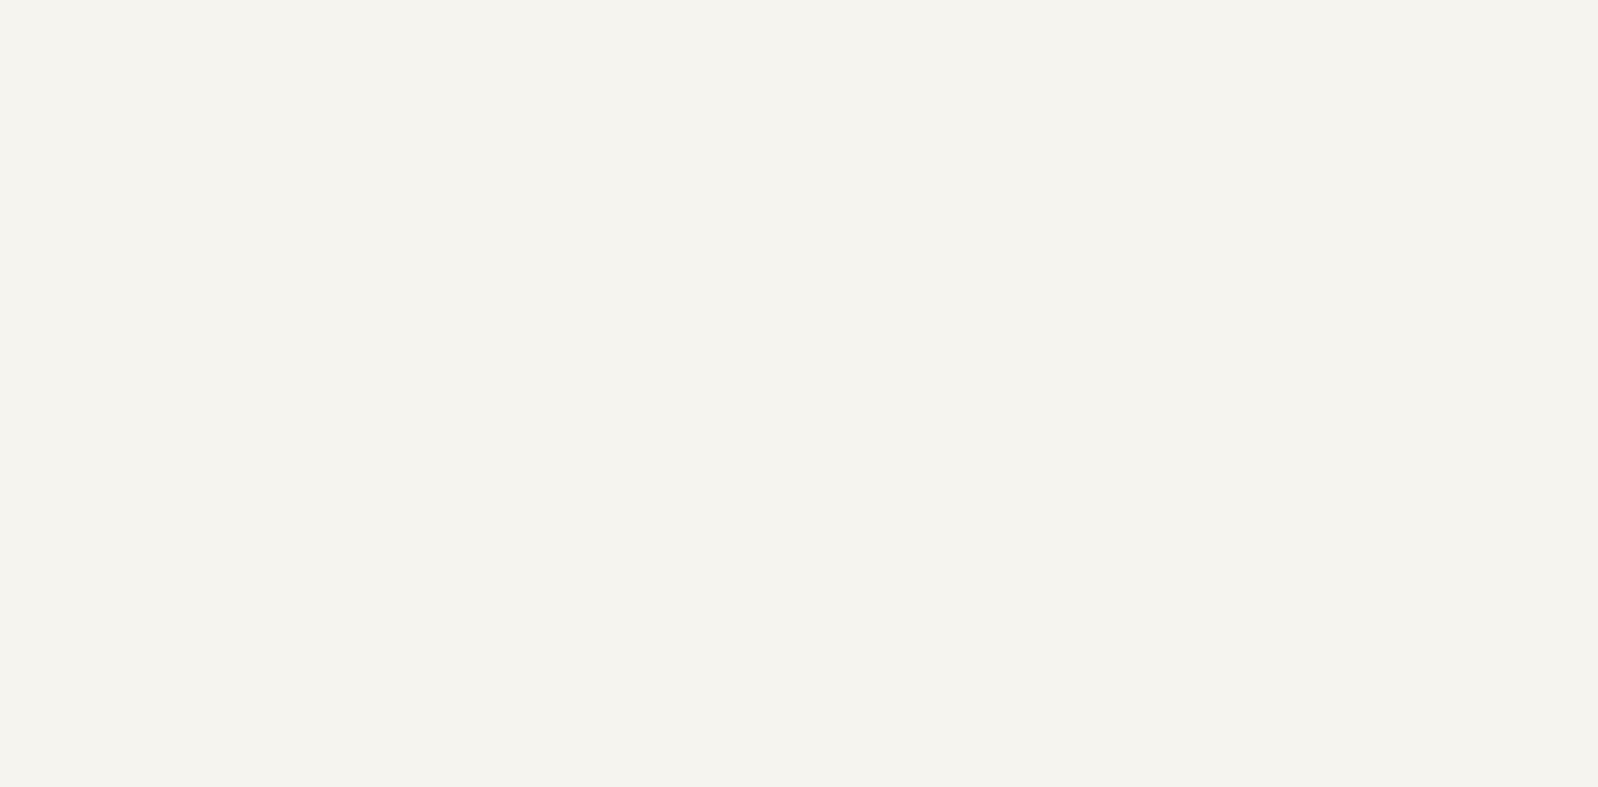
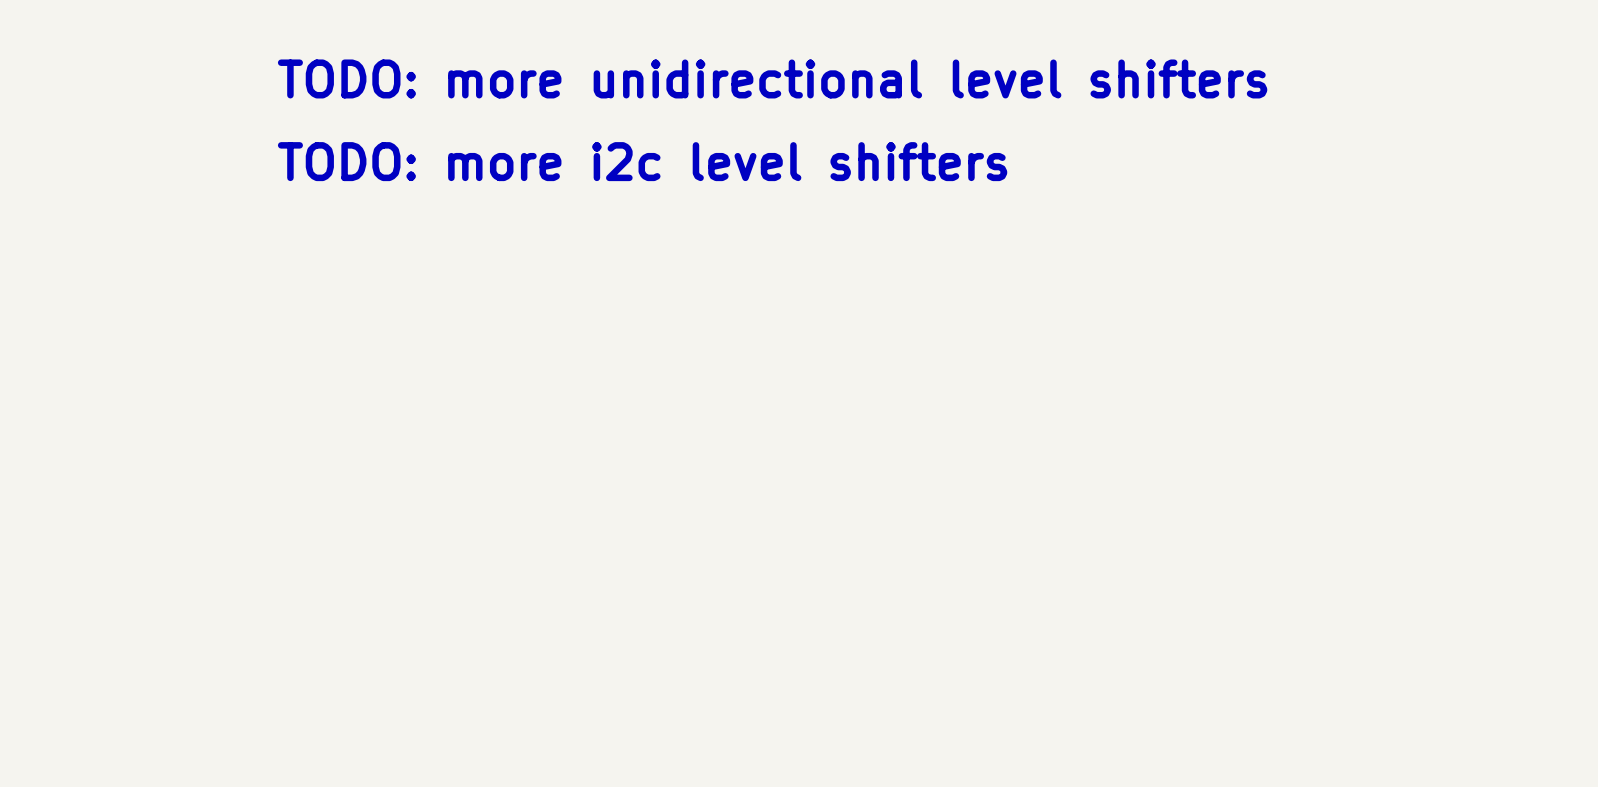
text: none -> TODO: more unidirectional level shifters (772, 78)
text: none -> TODO: more i2c level shifters (642, 161)

